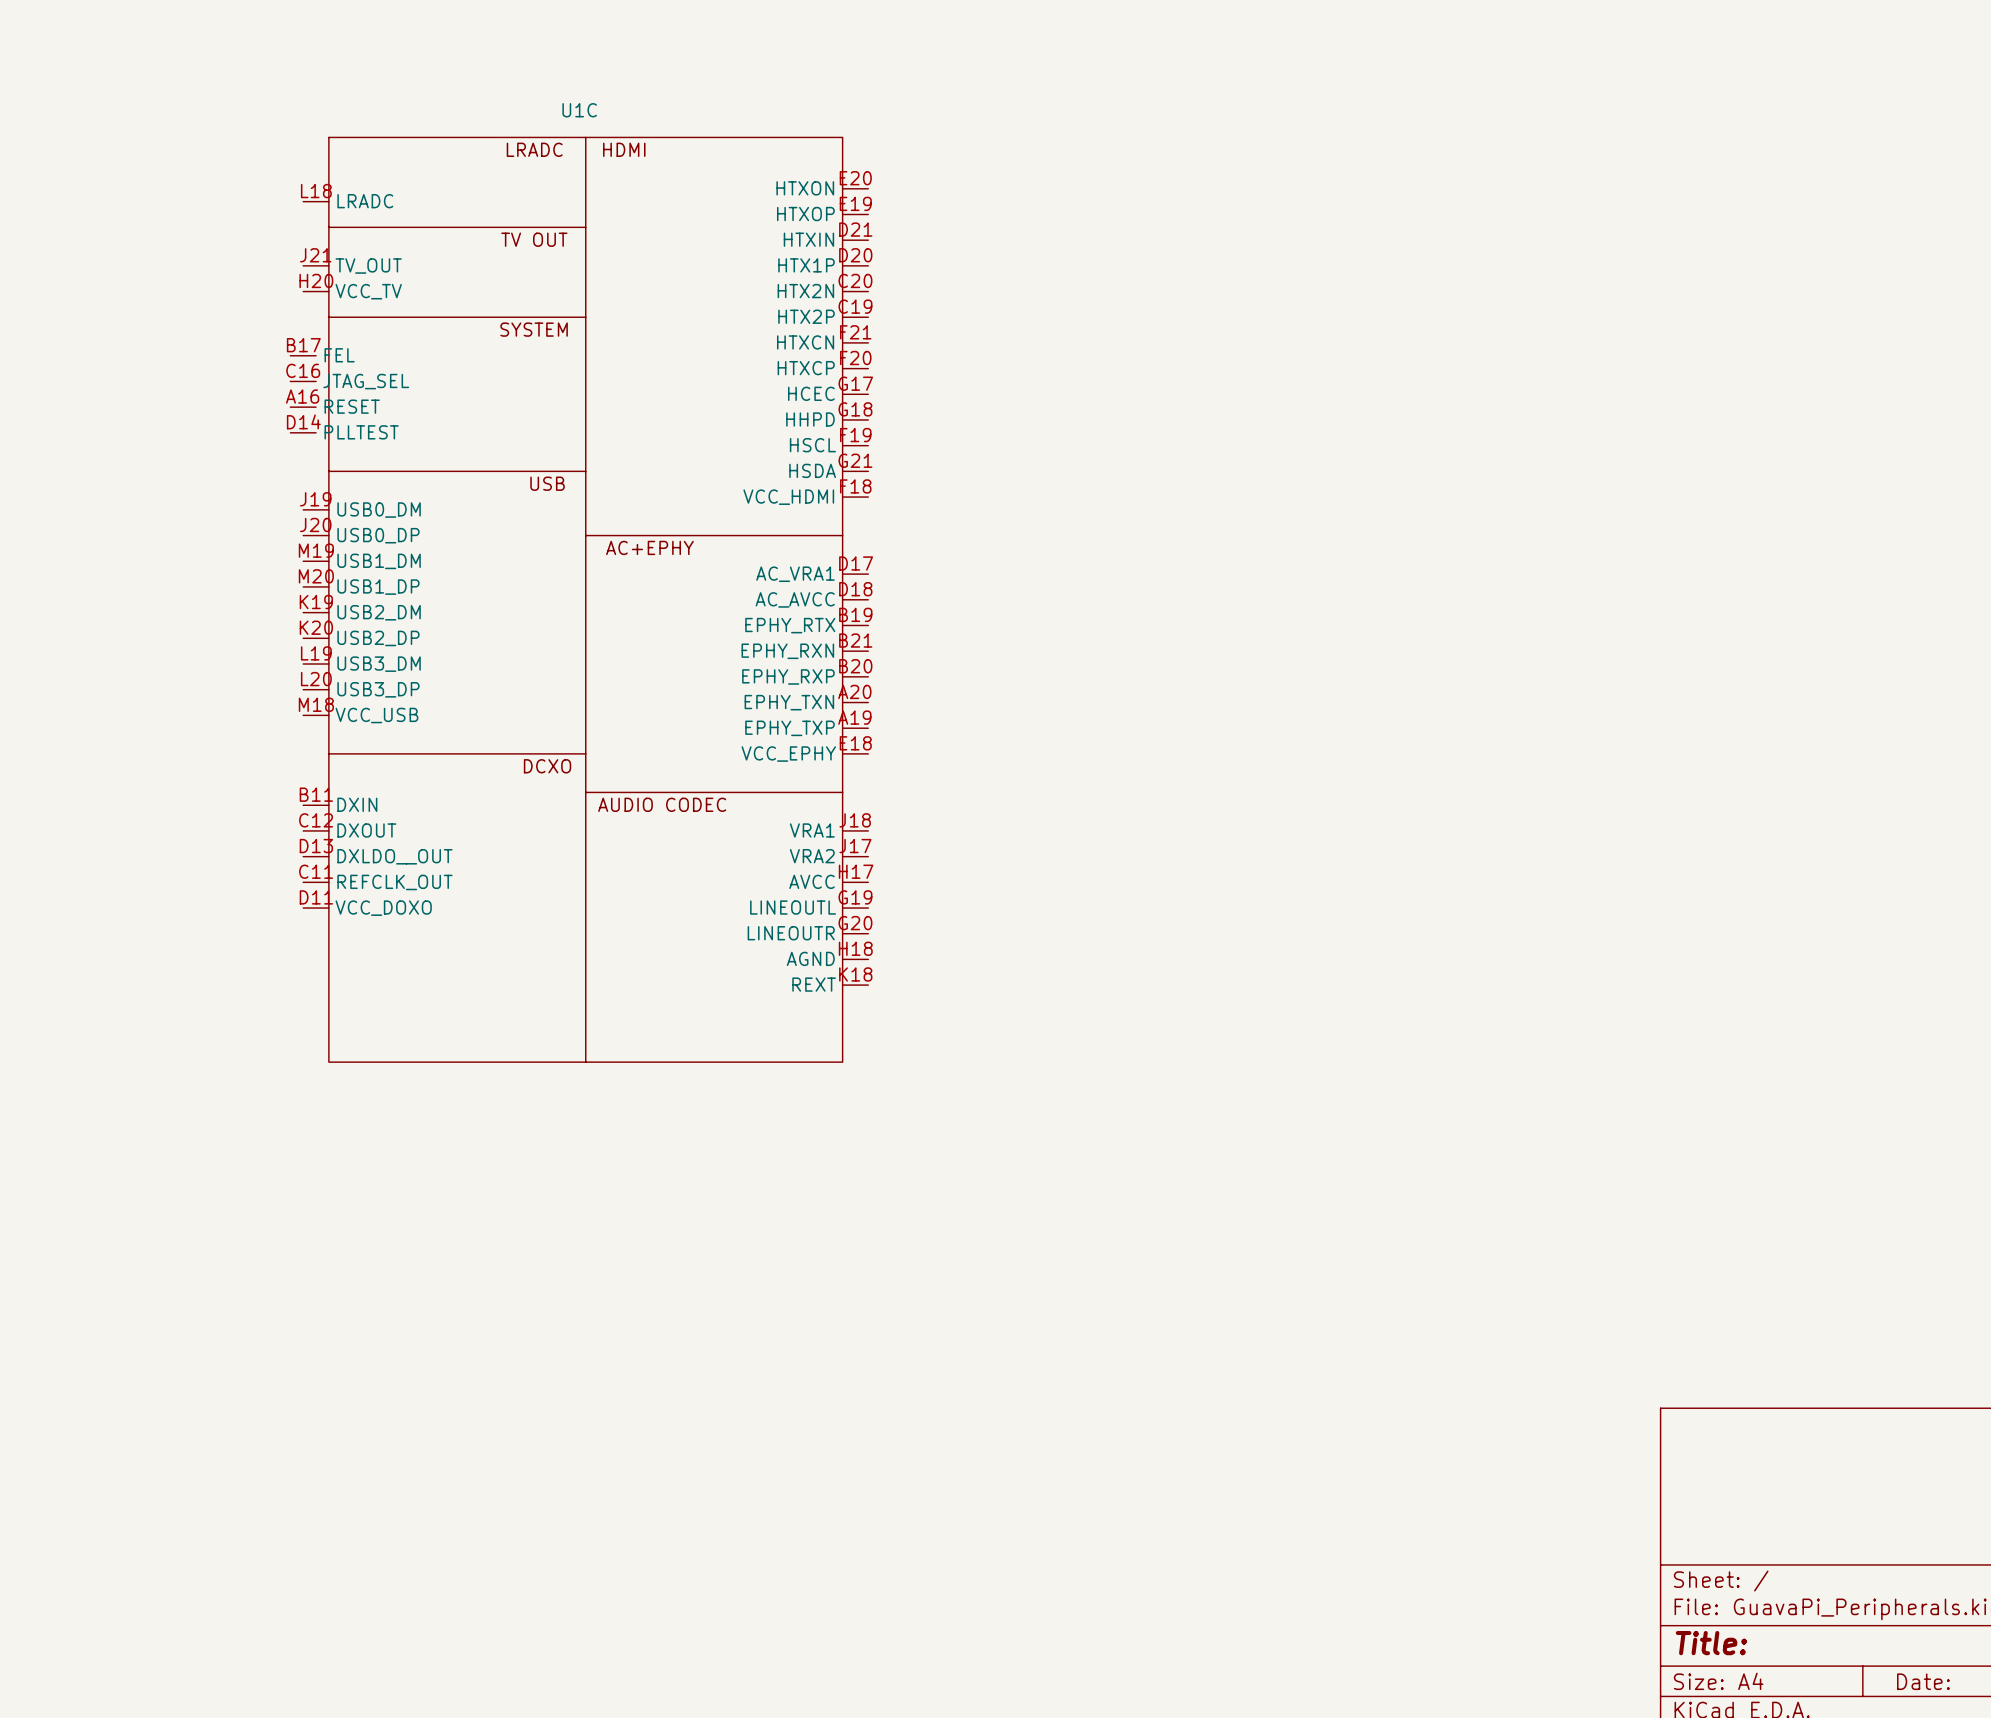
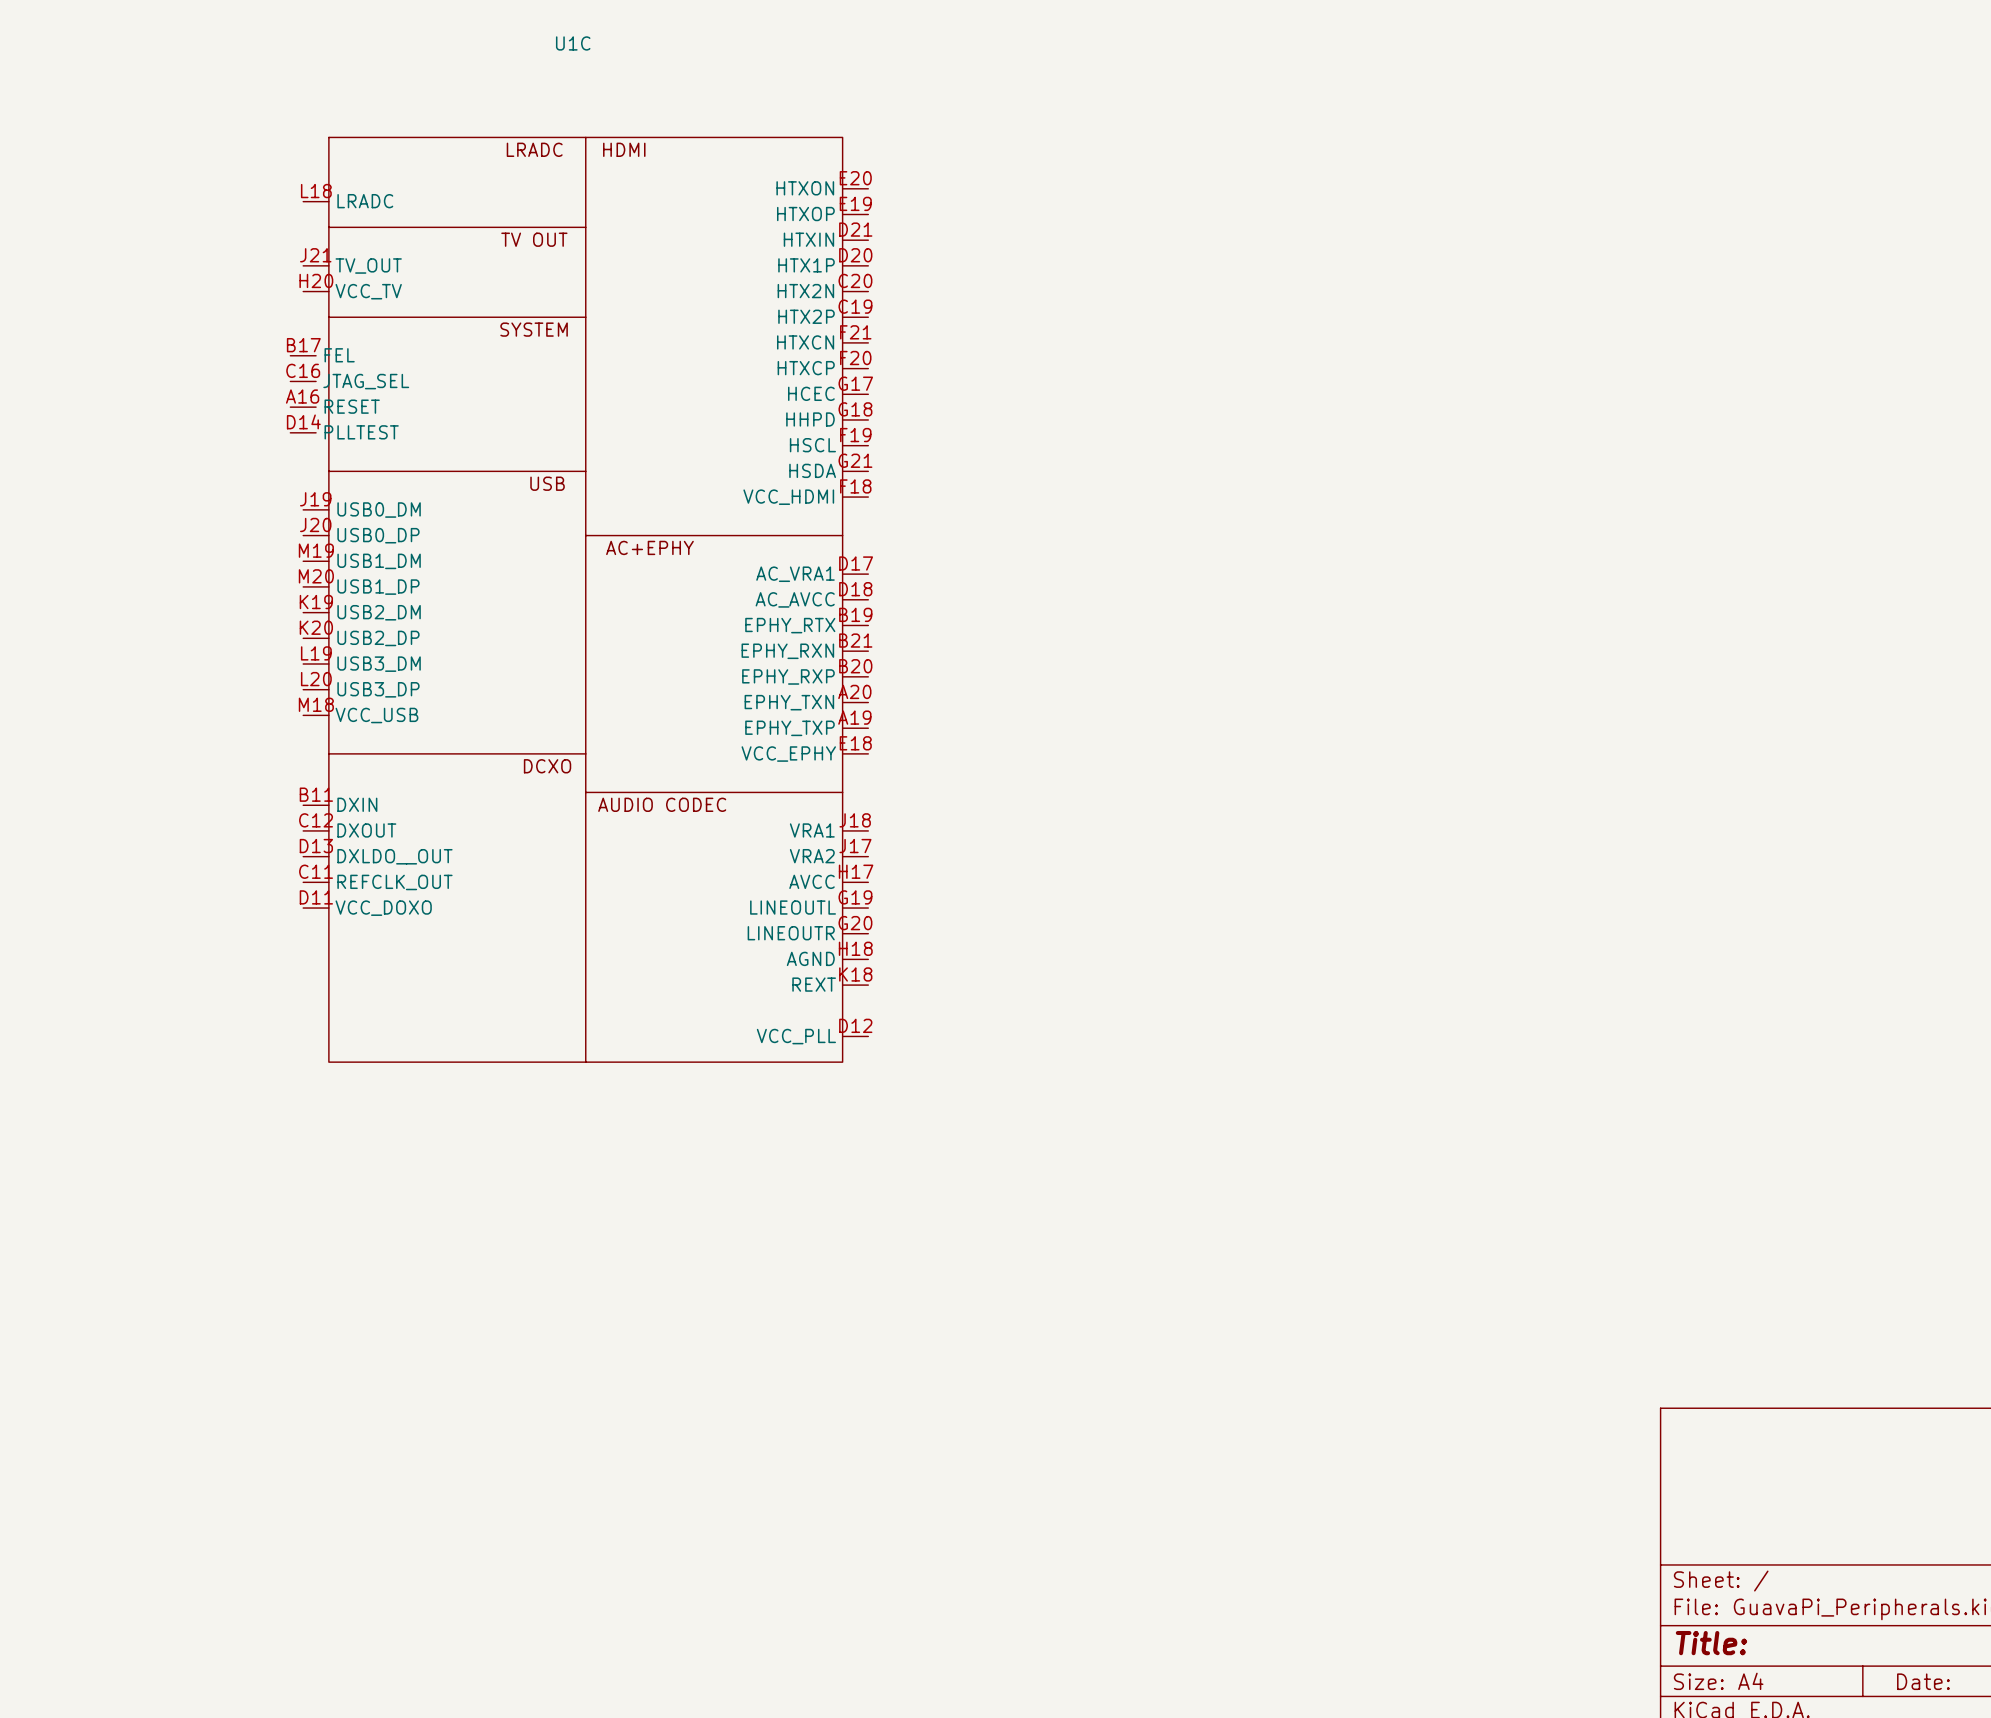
U1C name position: U1C (579, 110) -> U1C (573, 43)
U1C symbol: [290, 137, 869, 1063] -> [290, 137, 869, 1063]

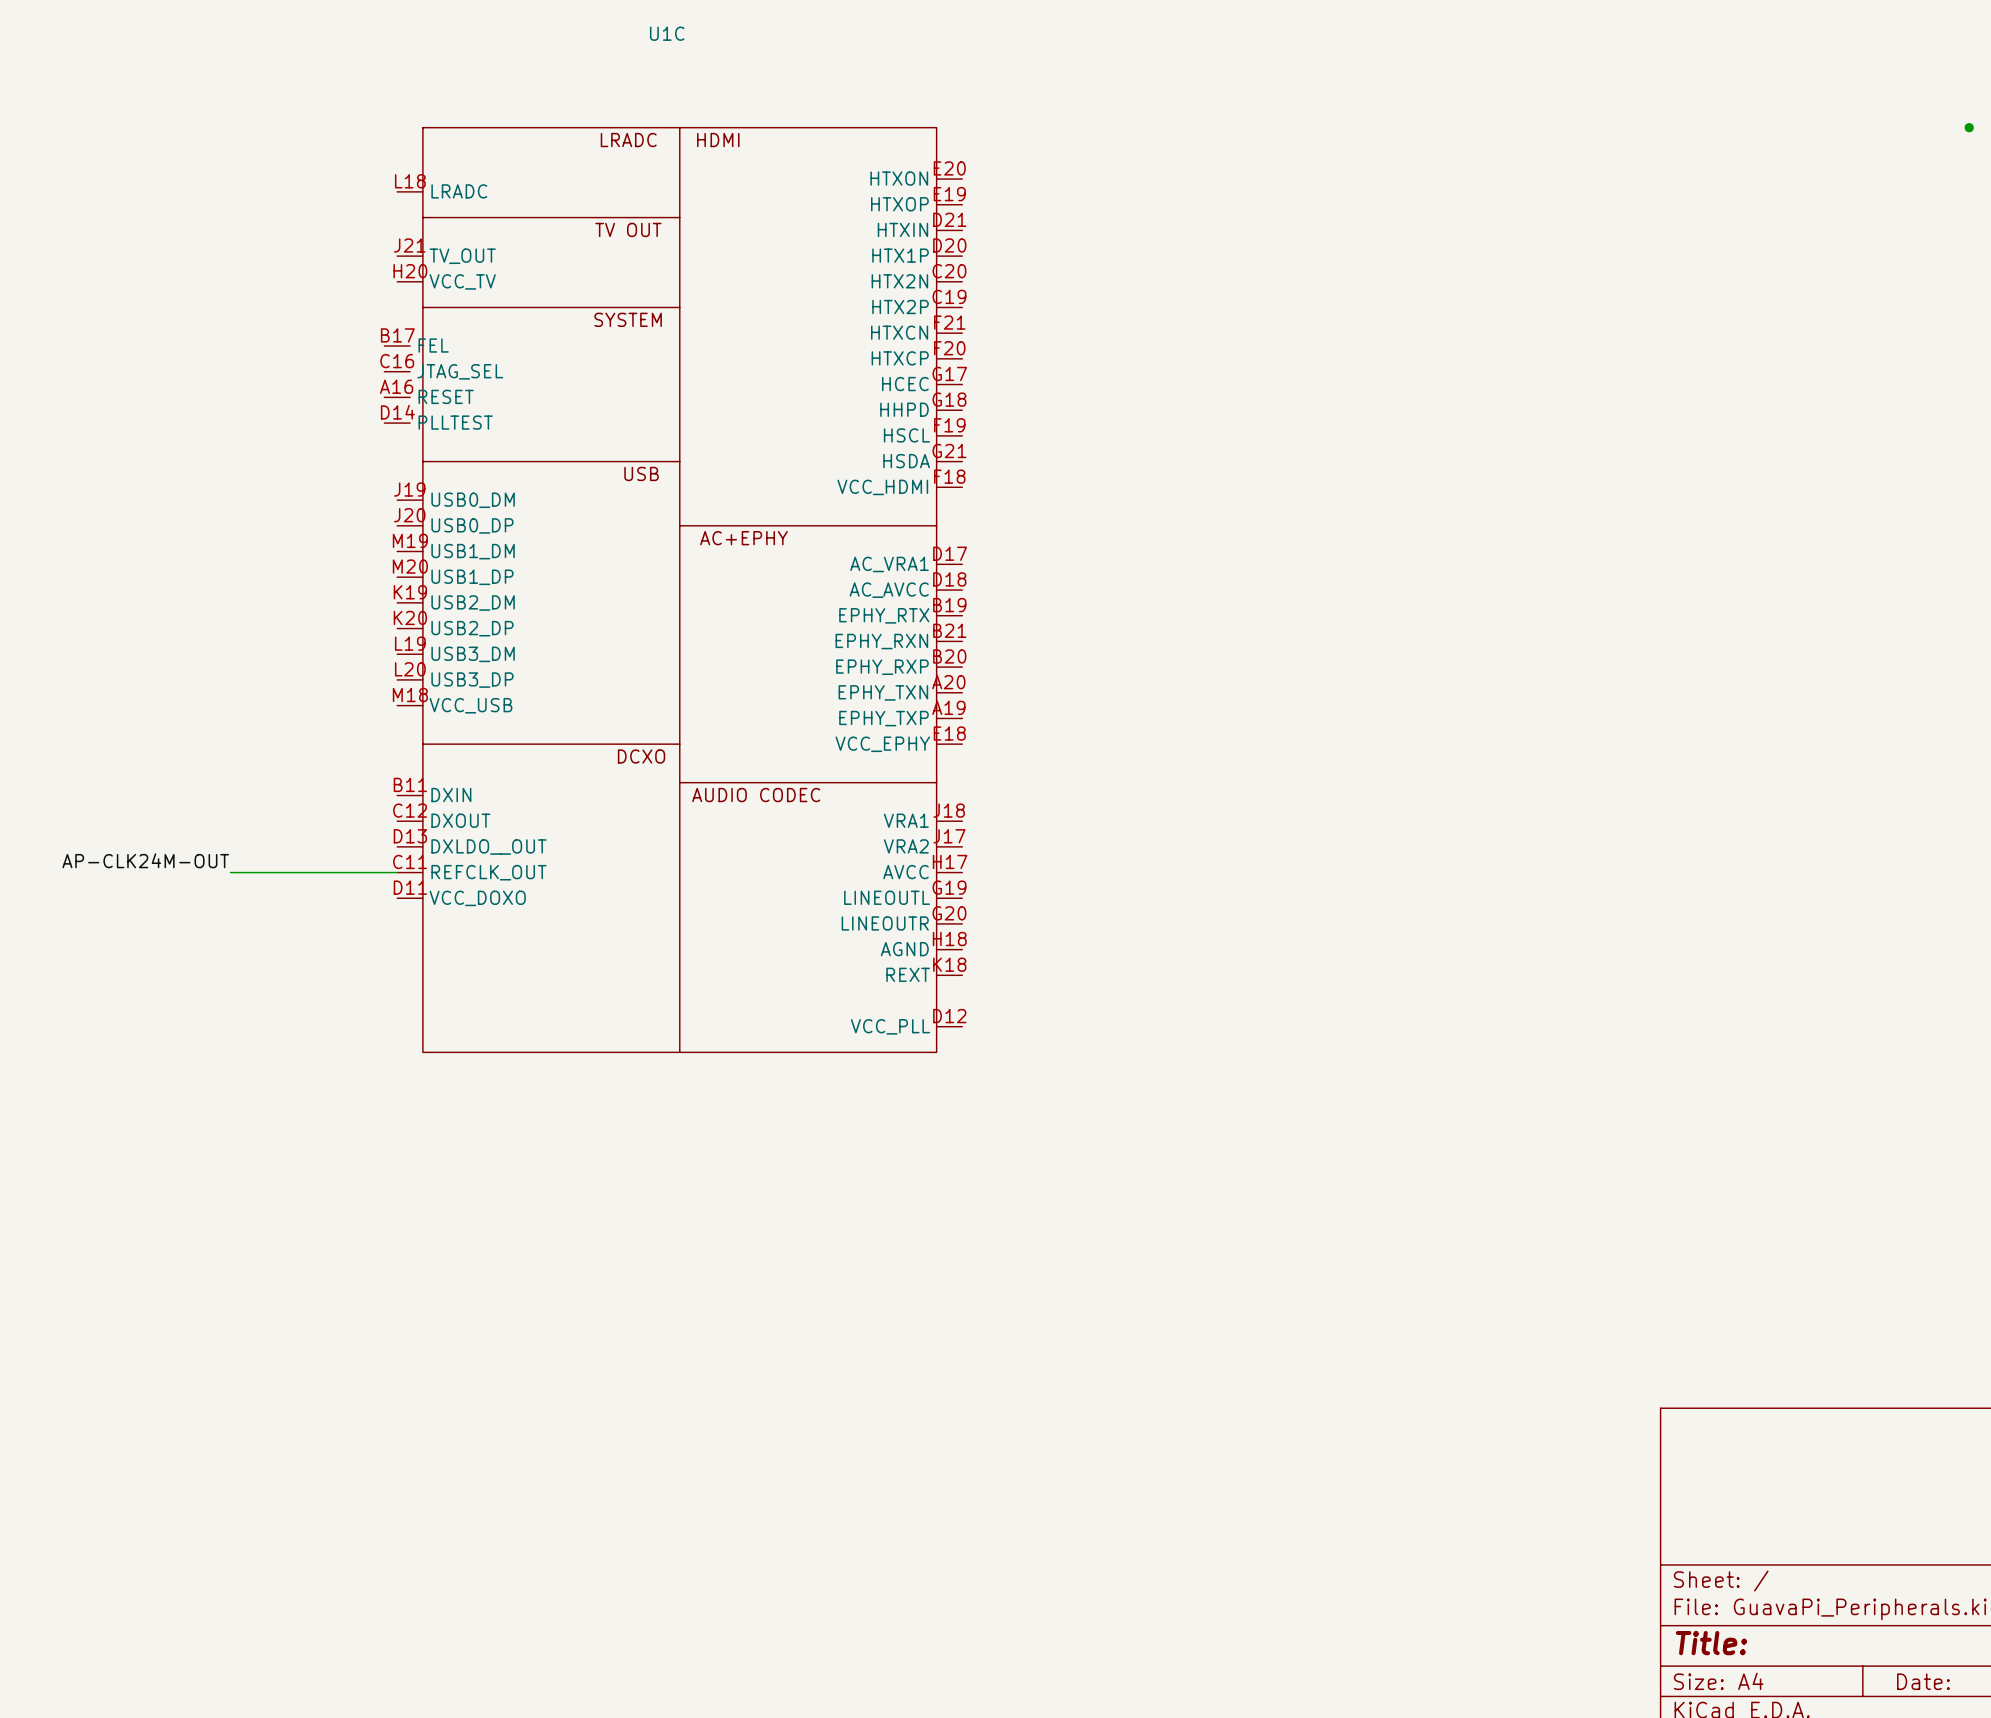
junction: none -> (1969, 127)
U1C position: (579, 599) -> (673, 590)
label: none -> AP-CLK24M-OUT (145, 860)
wire: none -> (230, 872) (397, 872)

